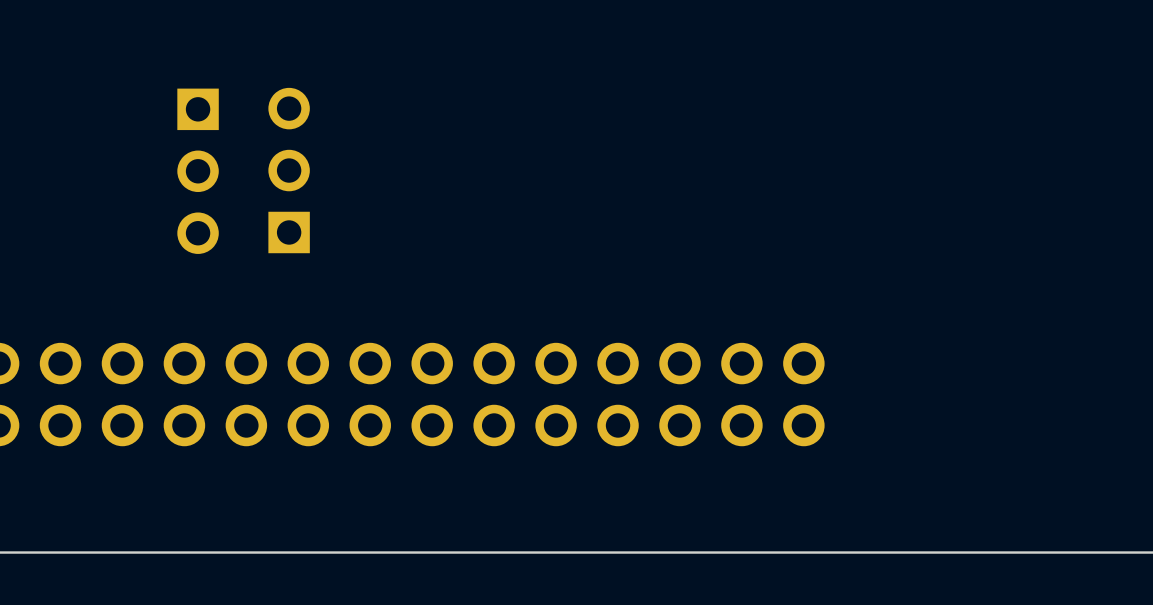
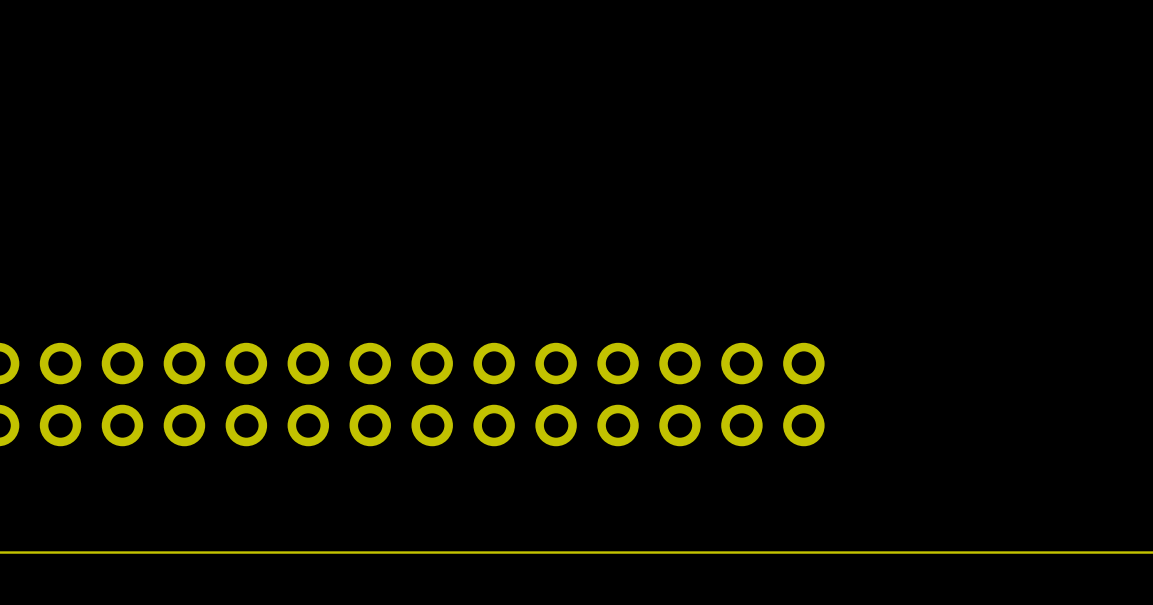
part: (289, 170) -> none
part: (198, 171) -> none

